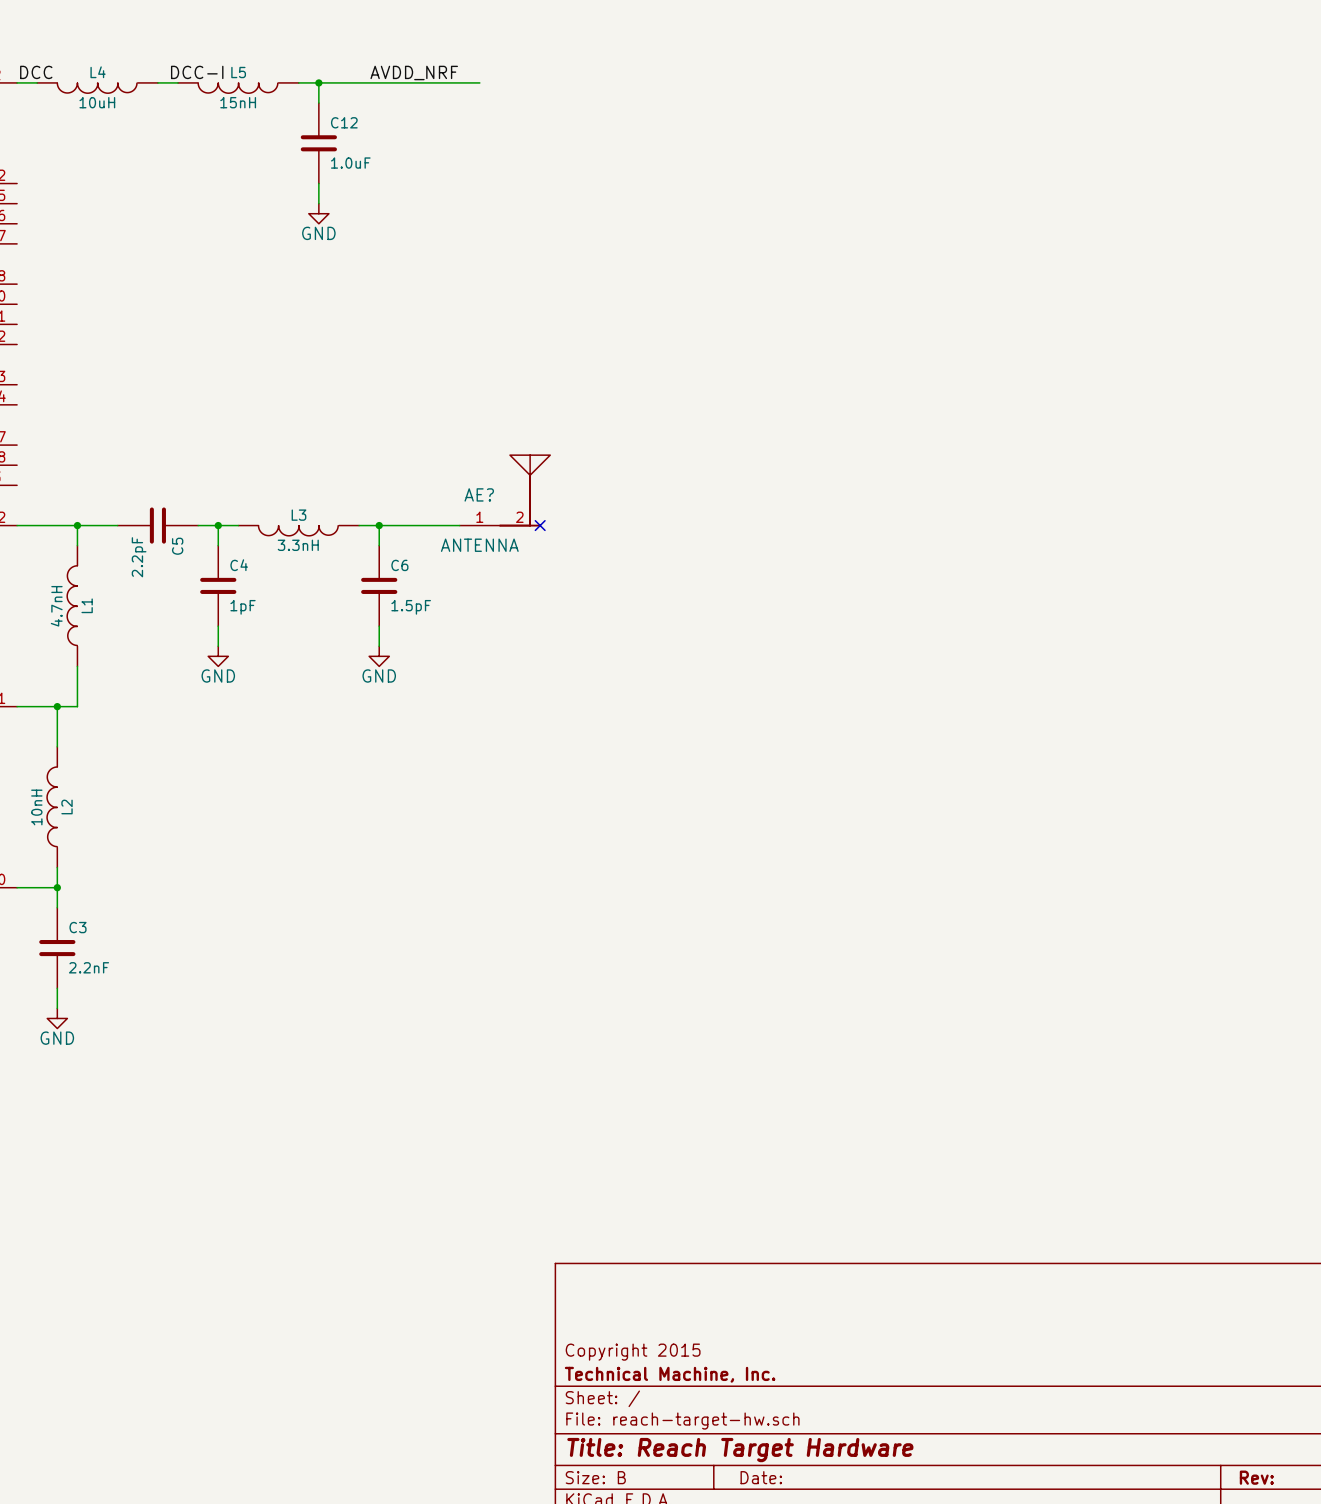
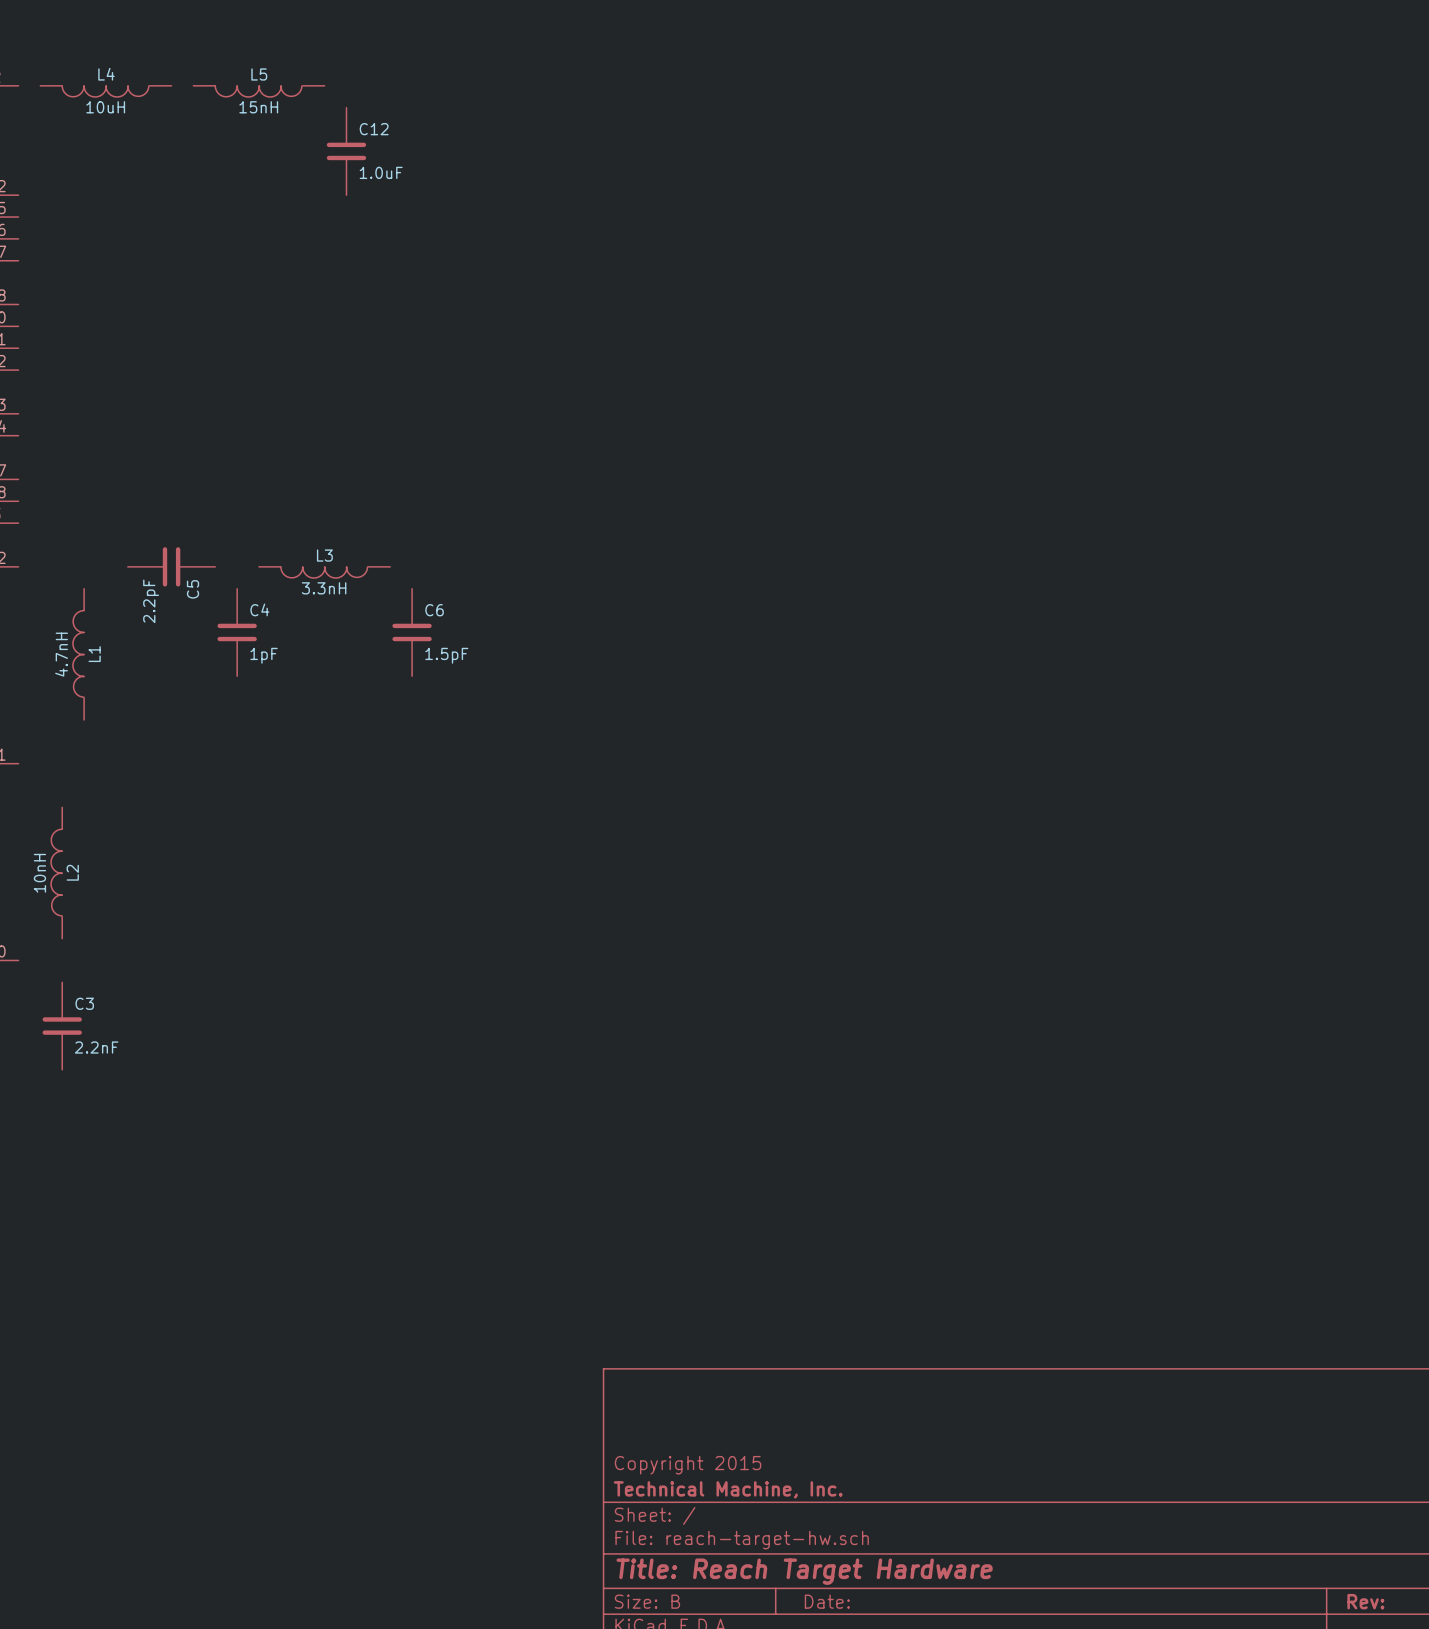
label: DCC (36, 72) -> none
label: DCC-I (197, 72) -> none
label: AVDD_NRF (414, 72) -> none
wire: (17, 82) (37, 82) -> none
wire: (157, 82) (178, 82) -> none
wire: (298, 82) (479, 82) -> none
wire: (318, 82) (318, 103) -> none
junction: (318, 82) -> none
wire: (318, 183) (318, 203) -> none
power symbol: GND (318, 213) -> none
AE?: ANTENNA (504, 490) -> none
wire: (17, 525) (117, 525) -> none
wire: (77, 525) (77, 545) -> none
junction: (77, 525) -> none
wire: (198, 525) (238, 525) -> none
wire: (218, 525) (218, 545) -> none
junction: (218, 525) -> none
wire: (359, 525) (459, 525) -> none
wire: (379, 525) (379, 545) -> none
junction: (379, 525) -> none
no-connect mark: (540, 525) -> none
wire: (218, 626) (218, 646) -> none
wire: (379, 626) (379, 646) -> none
power symbol: GND (218, 656) -> none
power symbol: GND (379, 656) -> none
wire: (77, 666) (77, 706) (17, 706) -> none
wire: (57, 706) (57, 746) -> none
junction: (57, 706) -> none
wire: (57, 867) (57, 907) -> none
wire: (17, 887) (57, 887) -> none
junction: (57, 887) -> none
wire: (57, 988) (57, 1008) -> none
power symbol: GND (57, 1018) -> none

